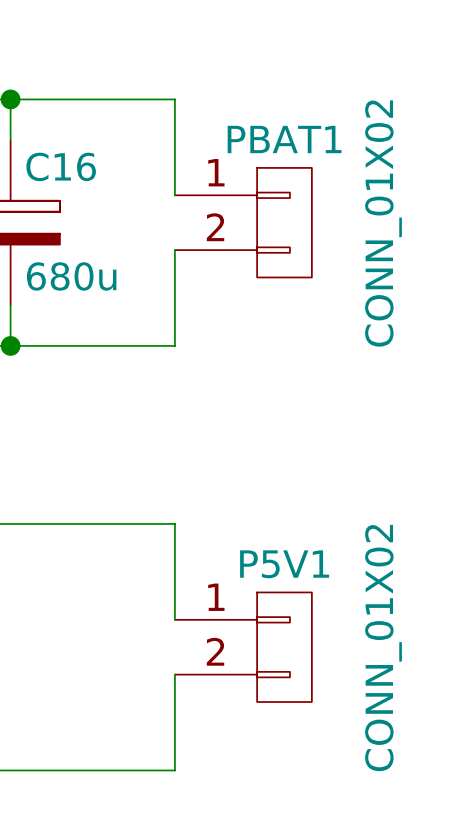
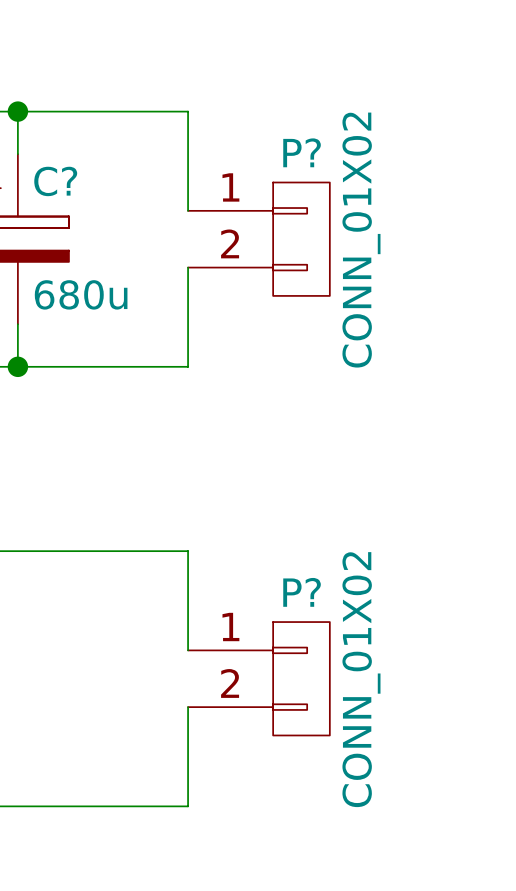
PBAT1 name: PBAT1 (284, 139) -> P? (302, 152)
C16 name: C16 (61, 166) -> C? (55, 181)
PBAT1 value position: CONN_01X02 (383, 223) -> CONN_01X02 (361, 240)
P5V1 name: P5V1 (284, 564) -> P? (302, 592)
P5V1 value position: CONN_01X02 (383, 648) -> CONN_01X02 (361, 679)

